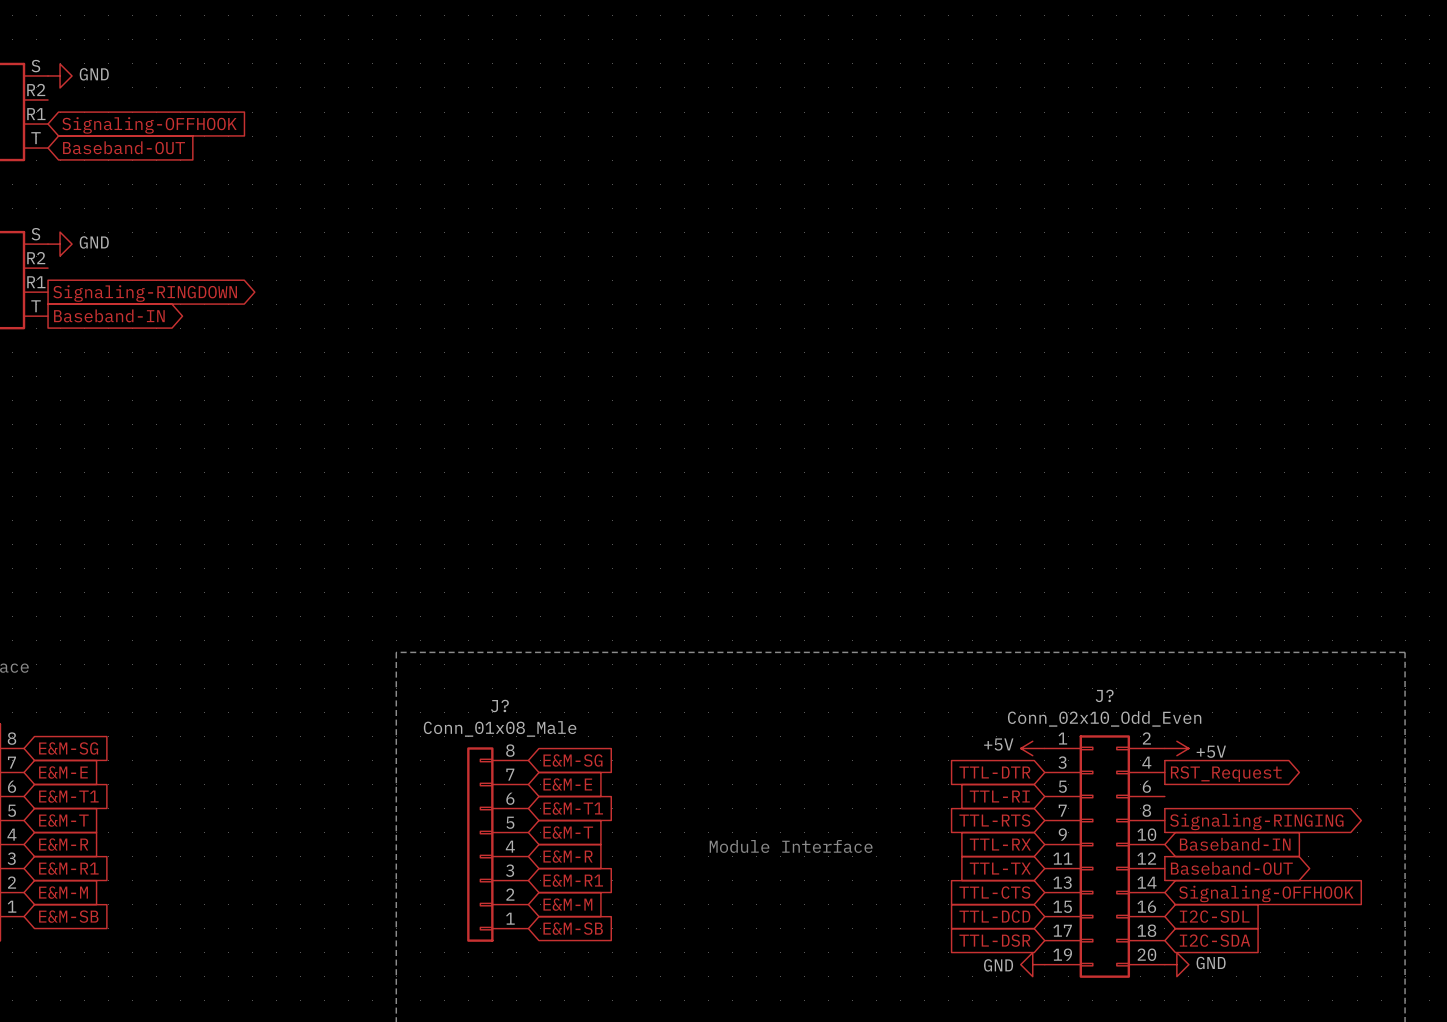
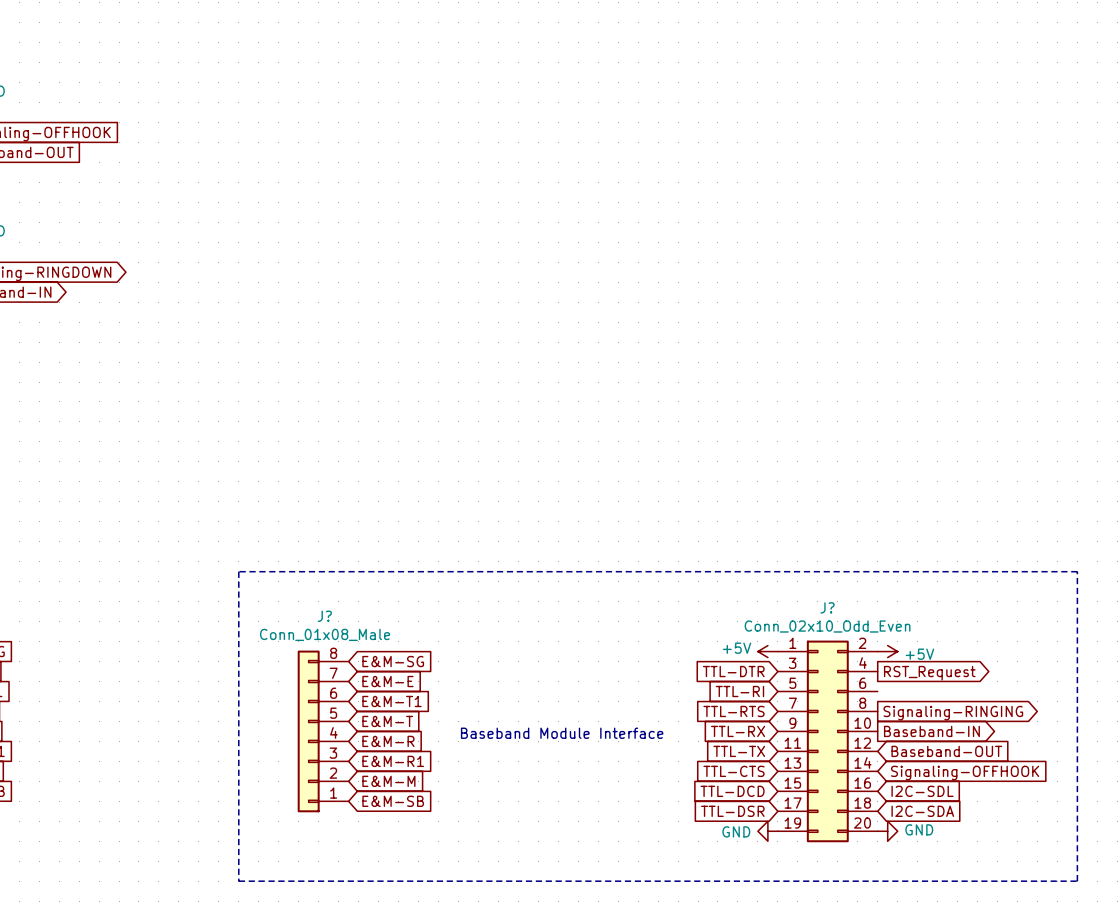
global label shape: input (1235, 844) -> output (931, 731)
text: Module Interface (791, 846) -> Baseband Module Interface (562, 733)
global label shape: output (1231, 868) -> input (946, 751)

